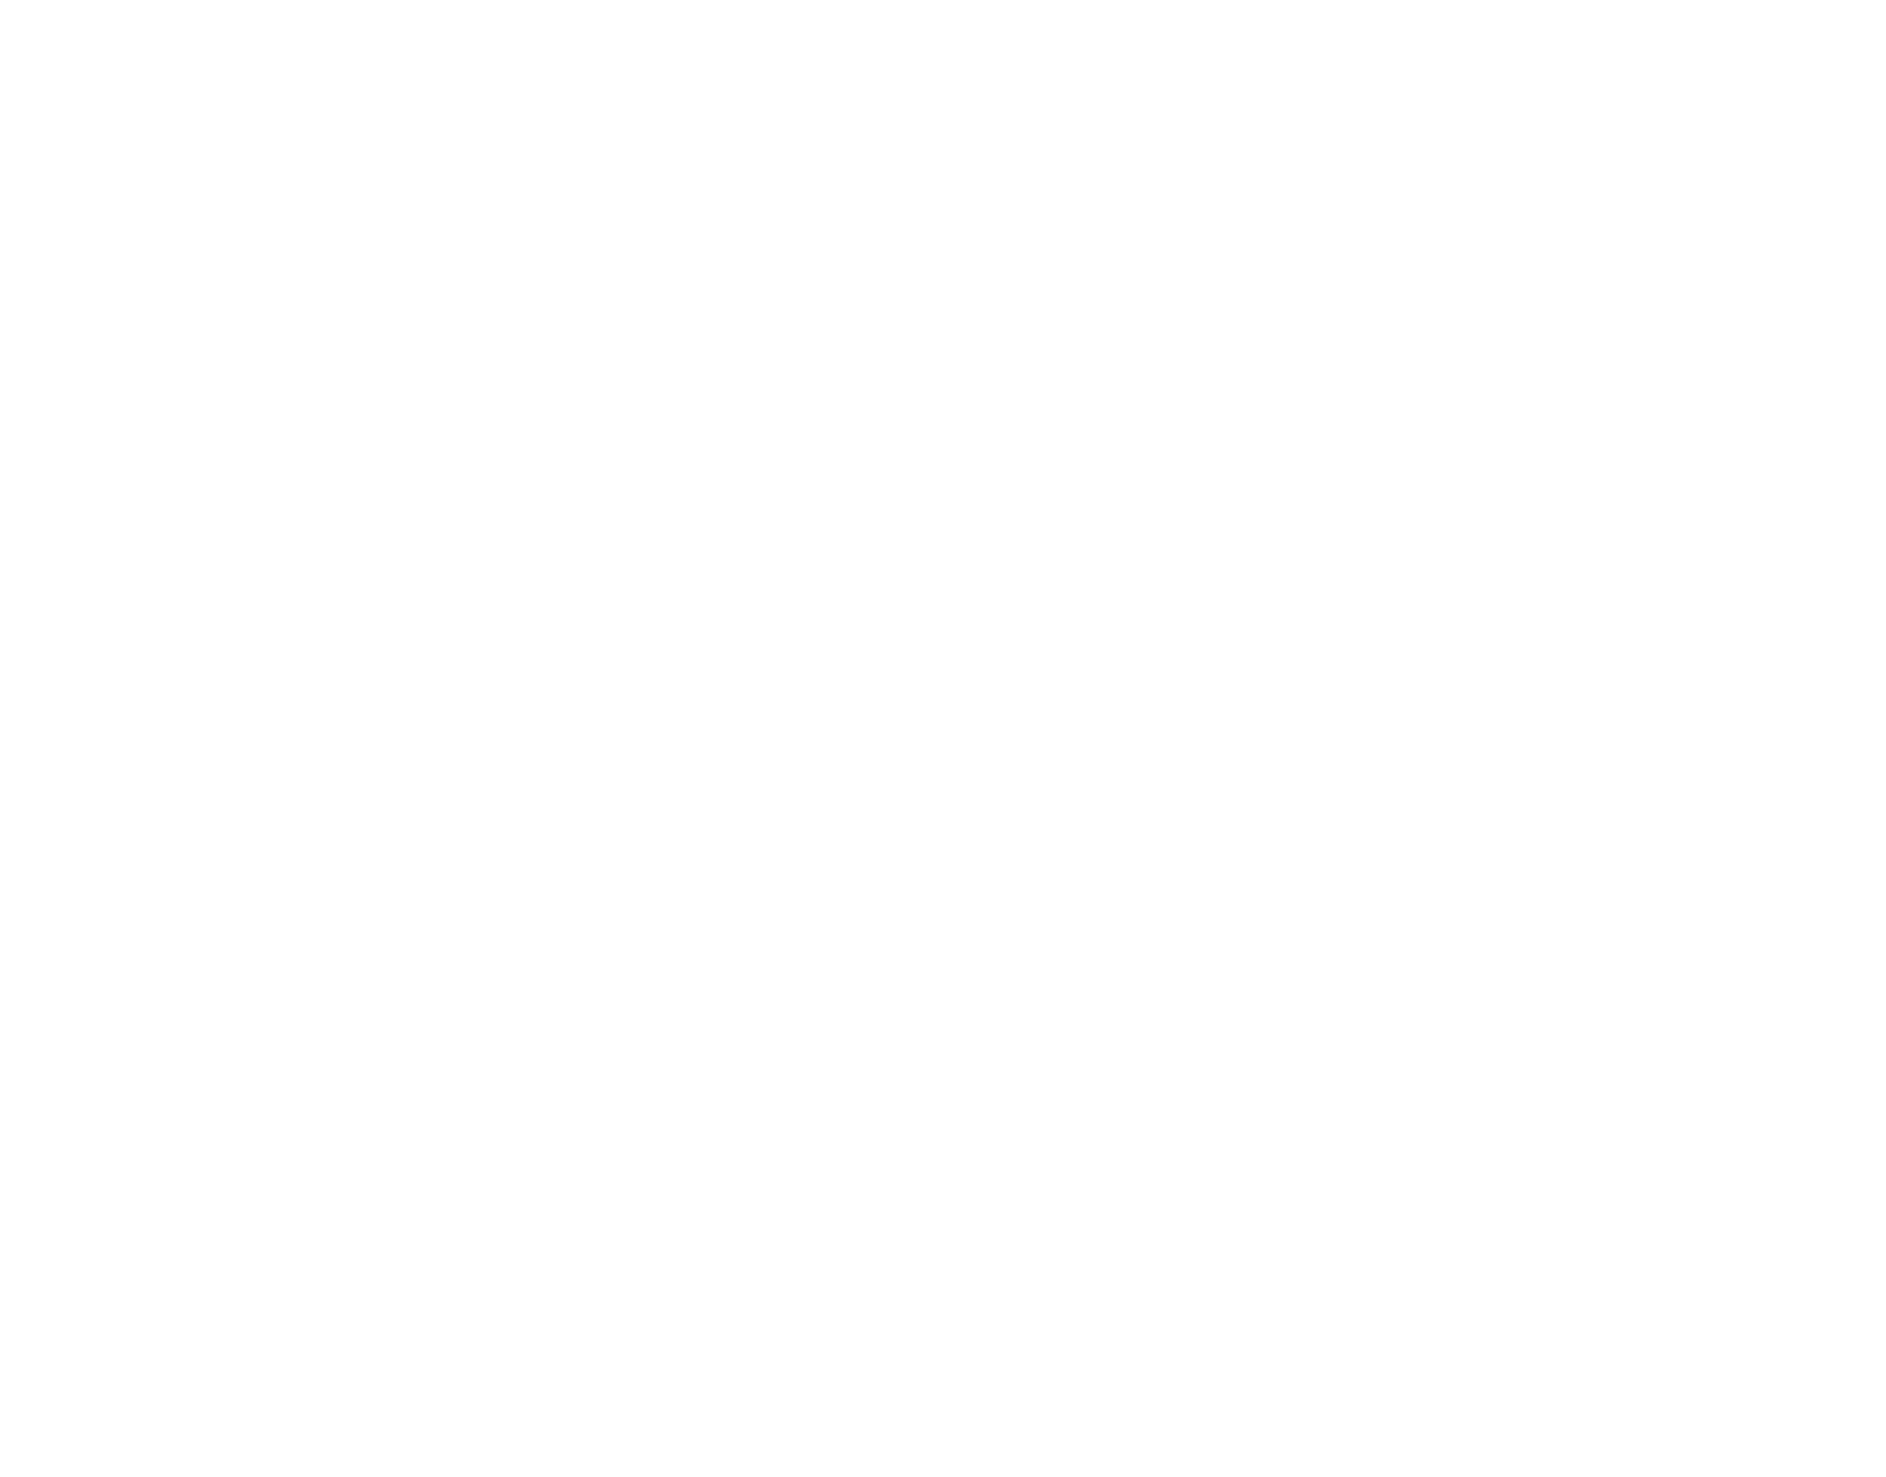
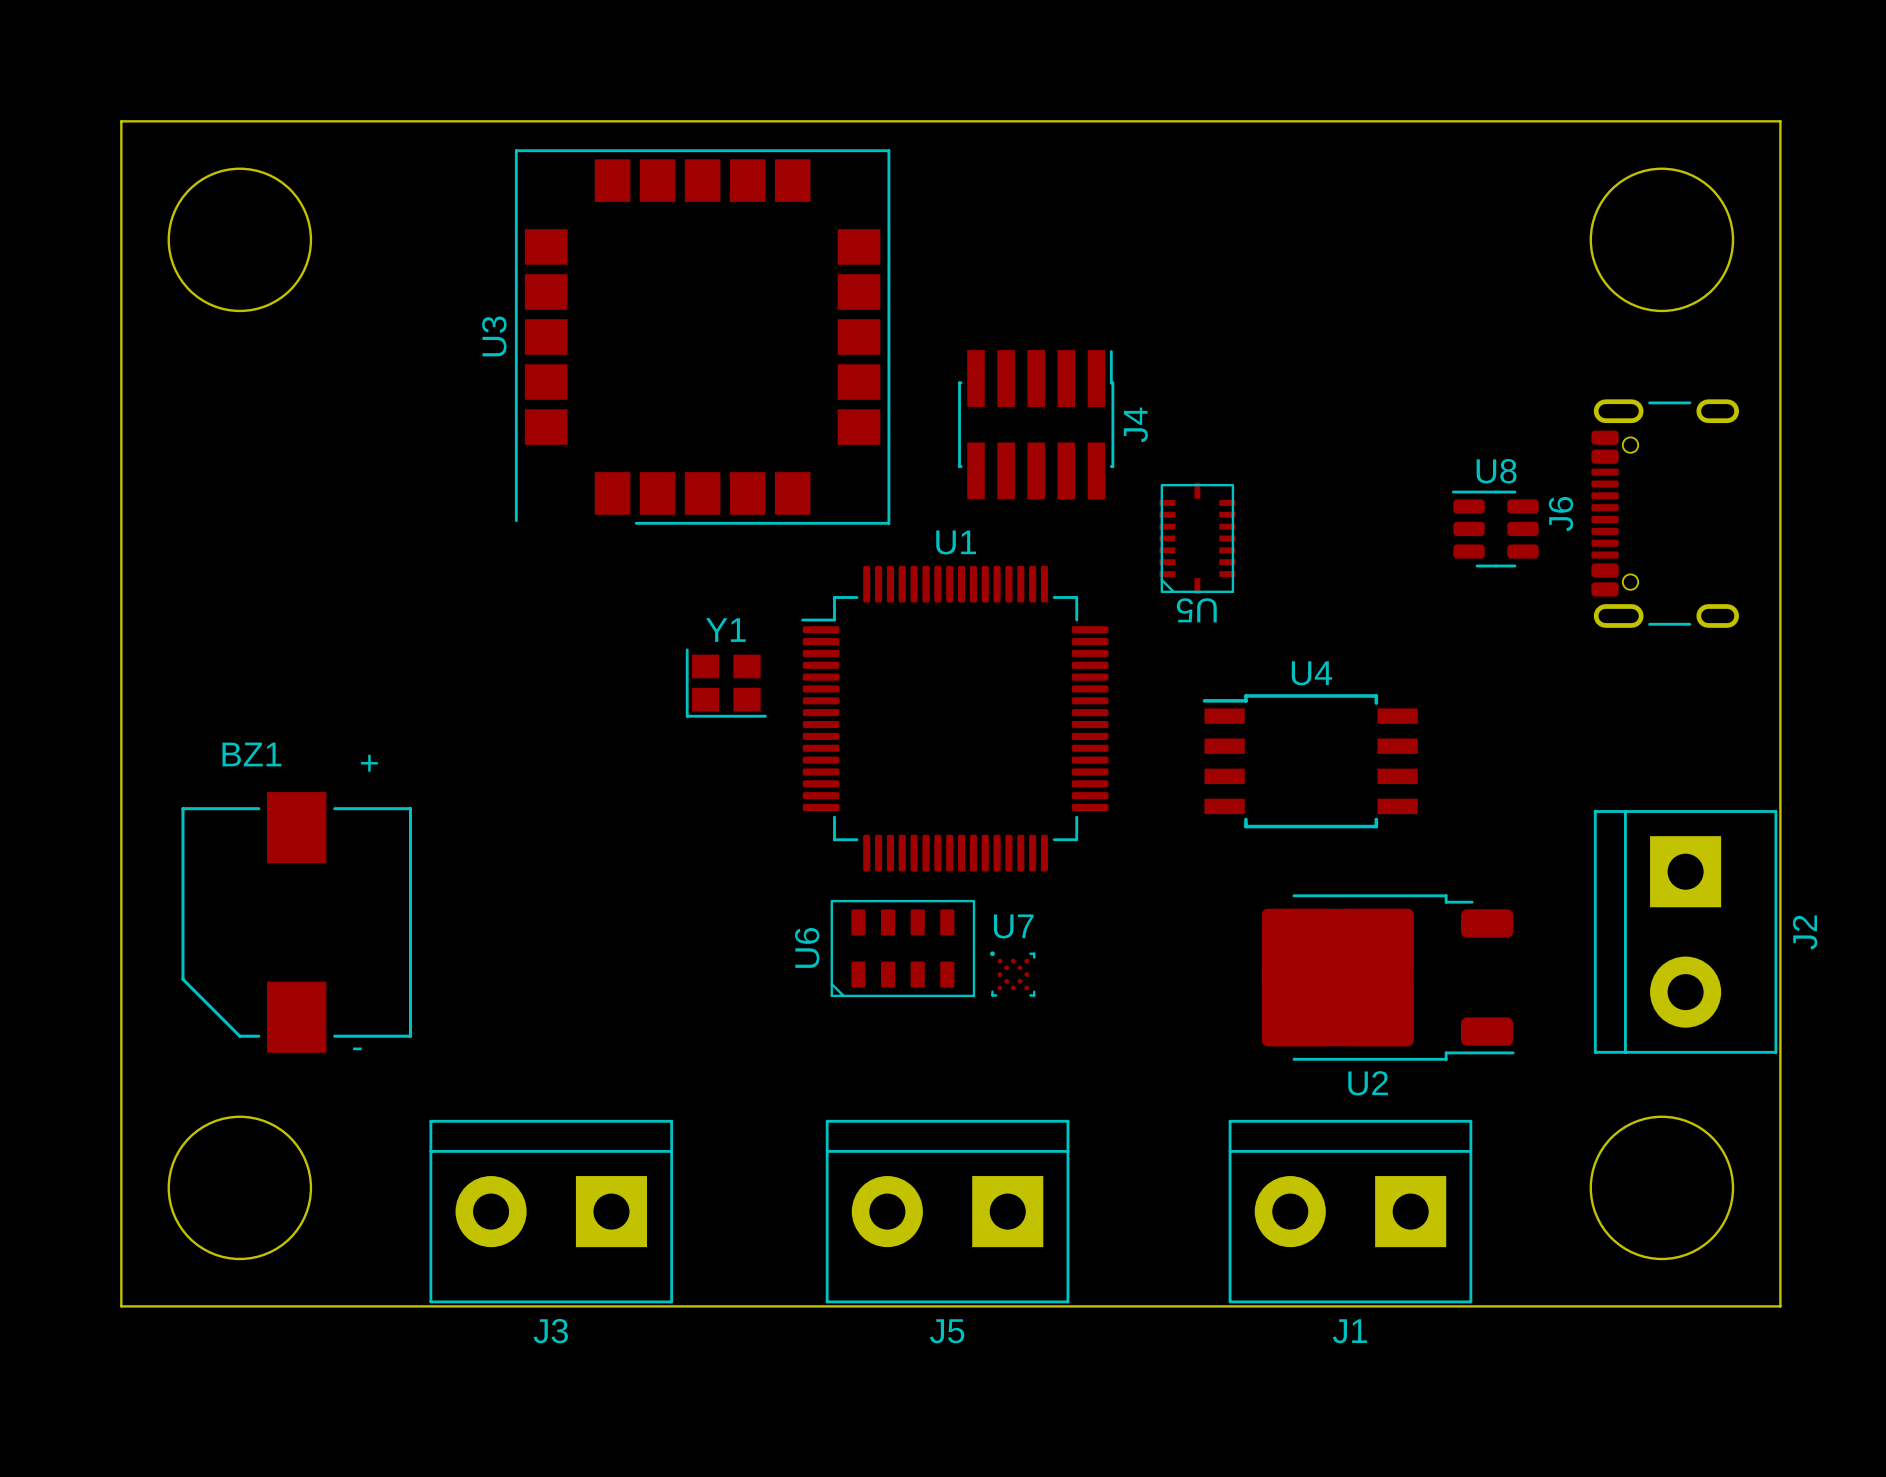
board edge: none -> (121, 121) (1780, 121) (1780, 1306) (121, 1306) (121, 121)
round board edge: none -> [167, 167, 313, 313]
round board edge: none -> [1589, 167, 1735, 313]
U3: none -> (702, 337)
J4: none -> (1036, 424)
J6: none -> (1665, 513)
U8: none -> (1495, 528)
U5: none -> (1197, 538)
Y1: none -> (726, 683)
U1: none -> (954, 718)
U4: none -> (1310, 761)
BZ1: none -> (296, 922)
J2: none -> (1685, 931)
U6: none -> (902, 948)
U7: none -> (1012, 973)
U2: none -> (1388, 977)
round board edge: none -> [167, 1115, 313, 1261]
round board edge: none -> [1589, 1115, 1735, 1261]
J3: none -> (551, 1211)
J5: none -> (947, 1211)
J1: none -> (1350, 1211)

